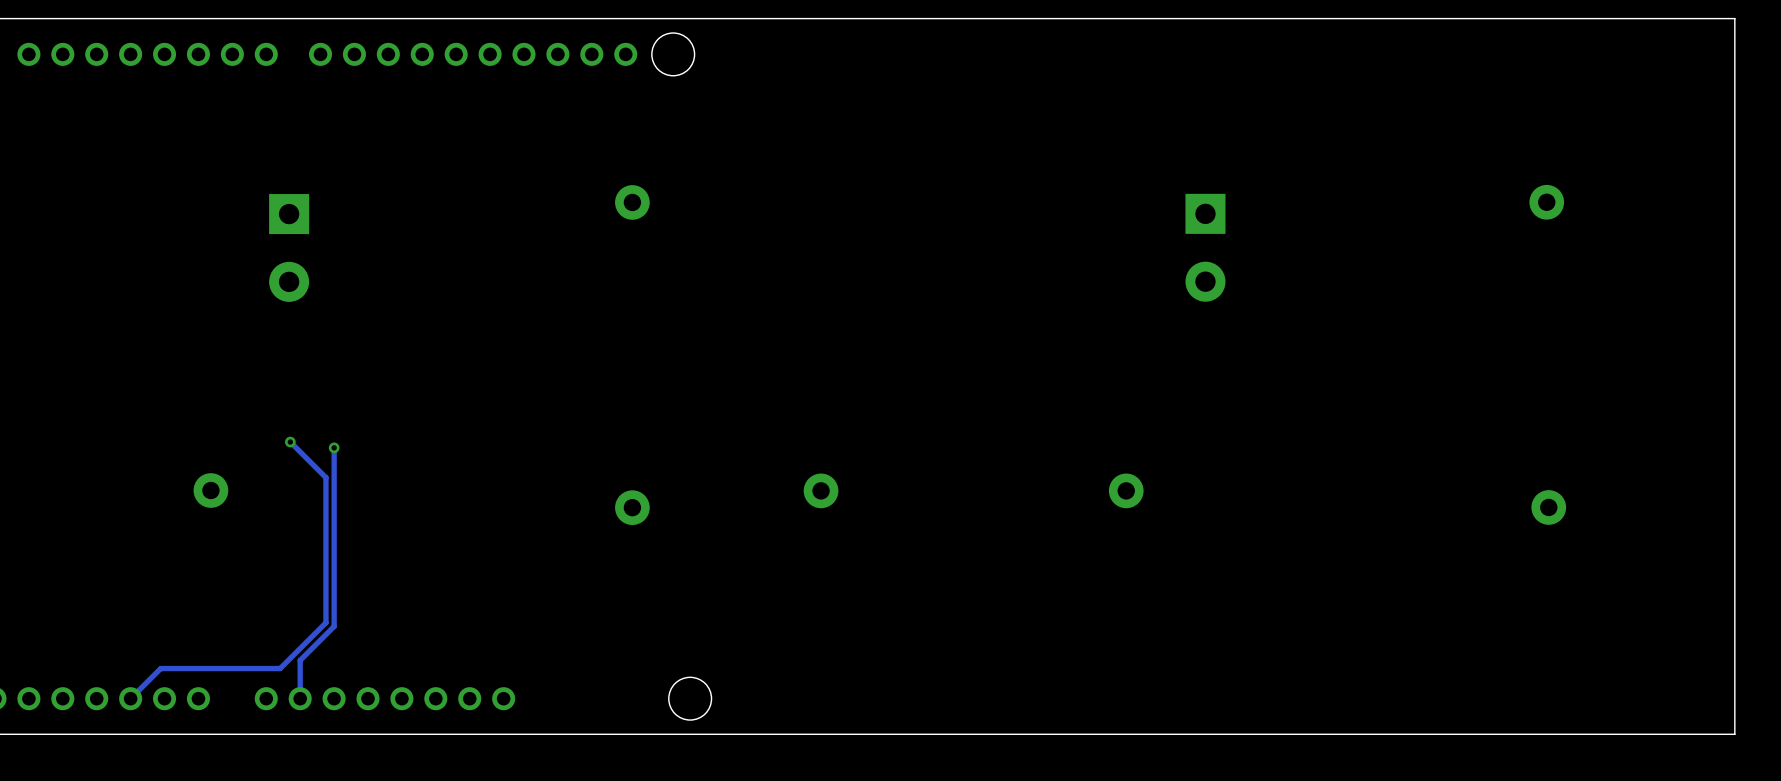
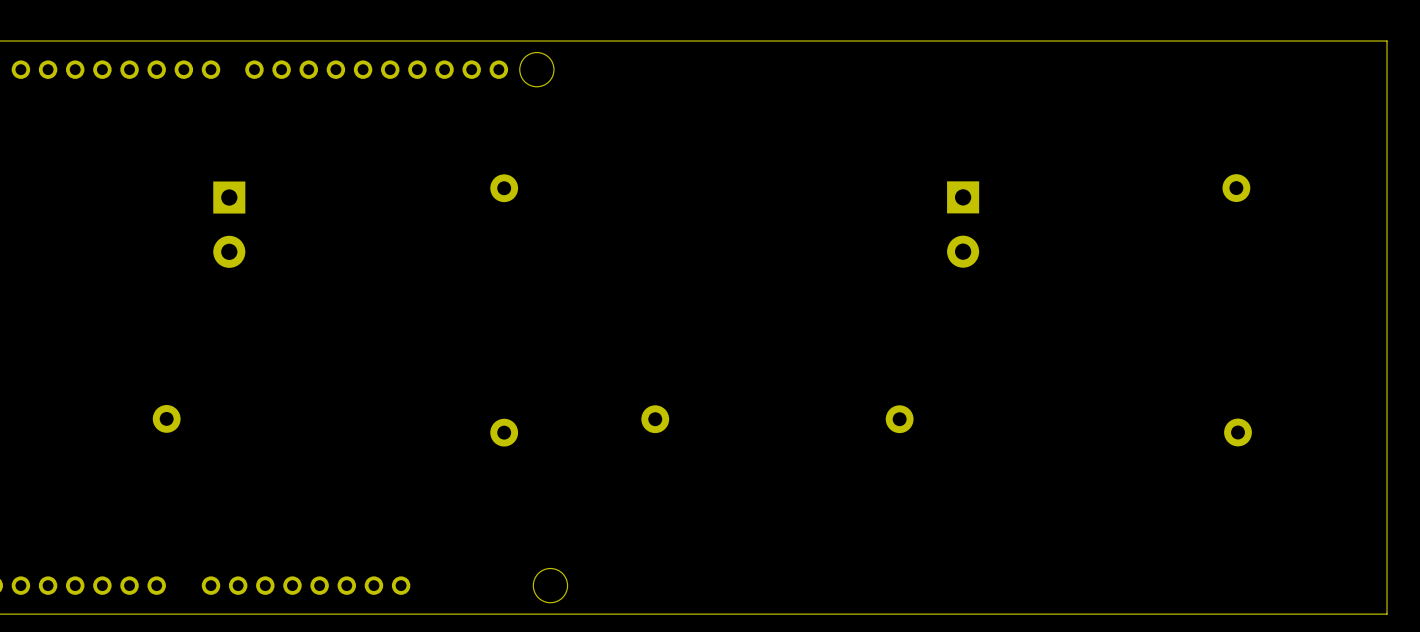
track: (290, 442) (325, 477) (325, 622) (280, 668) (160, 668) (130, 698) -> none
via: (290, 442) -> none
track: (334, 447) (334, 626) (300, 660) (300, 698) -> none
via: (334, 447) -> none

